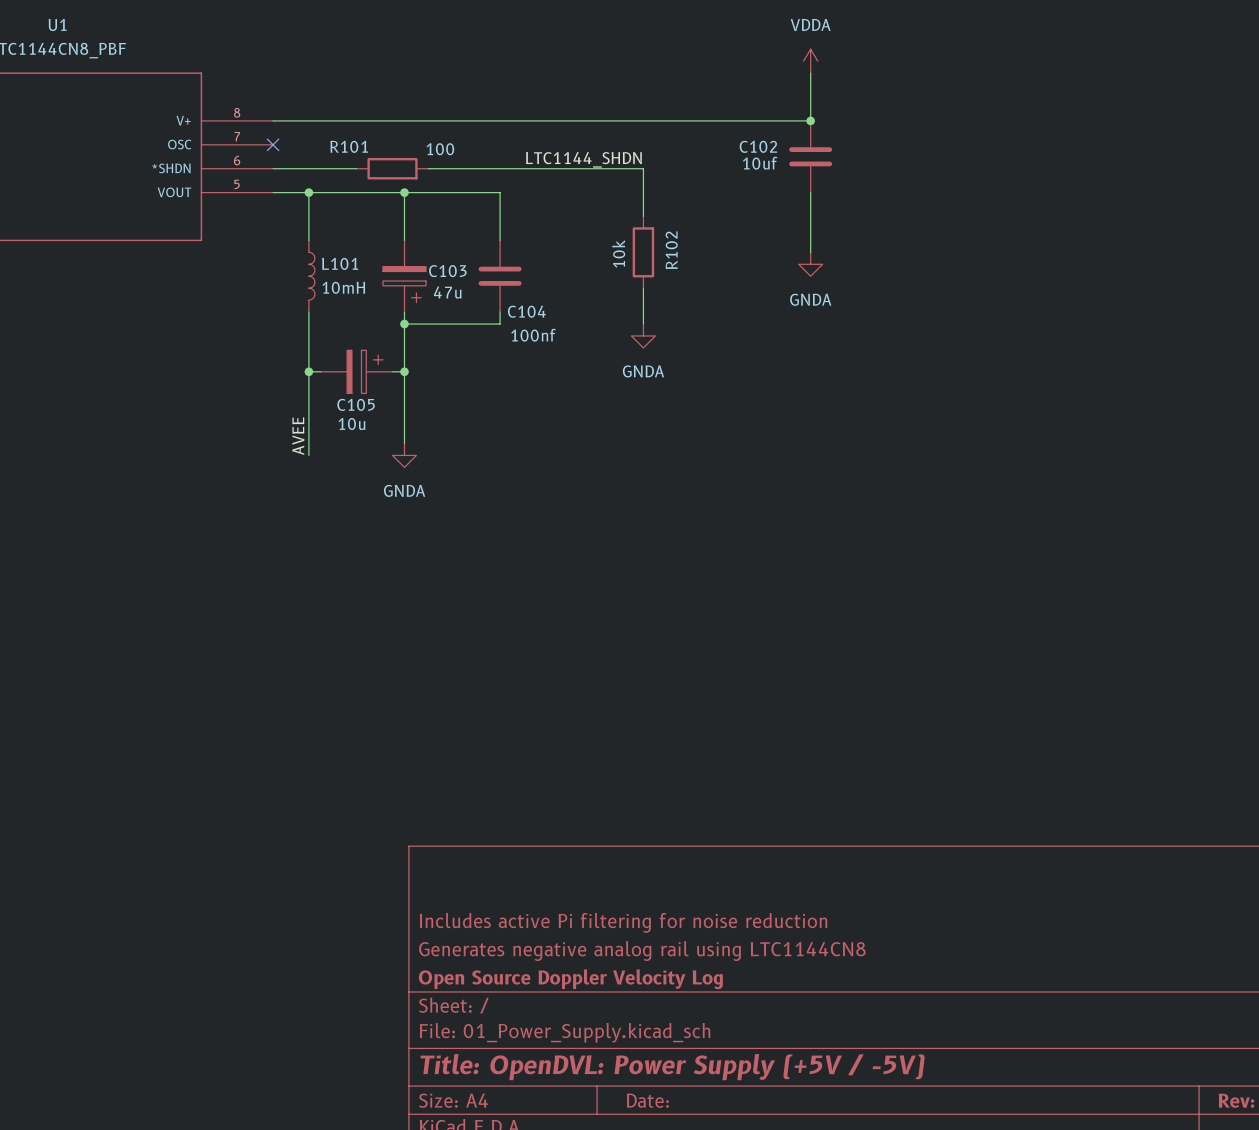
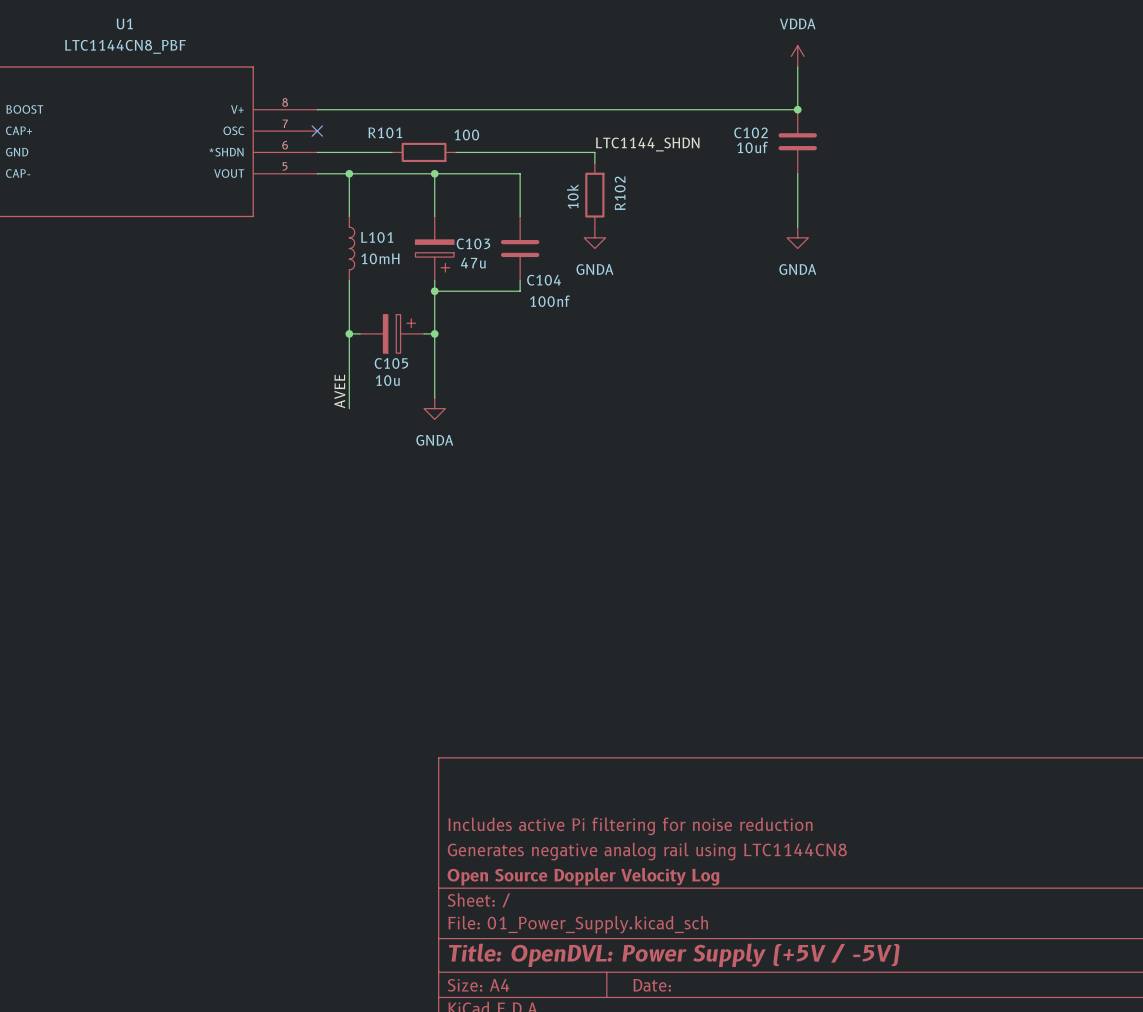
label position: LTC1144_SHDN (583, 159) -> LTC1144_SHDN (647, 144)
wire: (583, 168) (643, 168) (643, 216) -> (594, 152) (594, 163)
R102 position: (643, 252) -> (594, 195)
wire: (643, 288) (643, 324) -> none
power symbol position: GNDA (643, 335) -> GNDA (594, 237)

